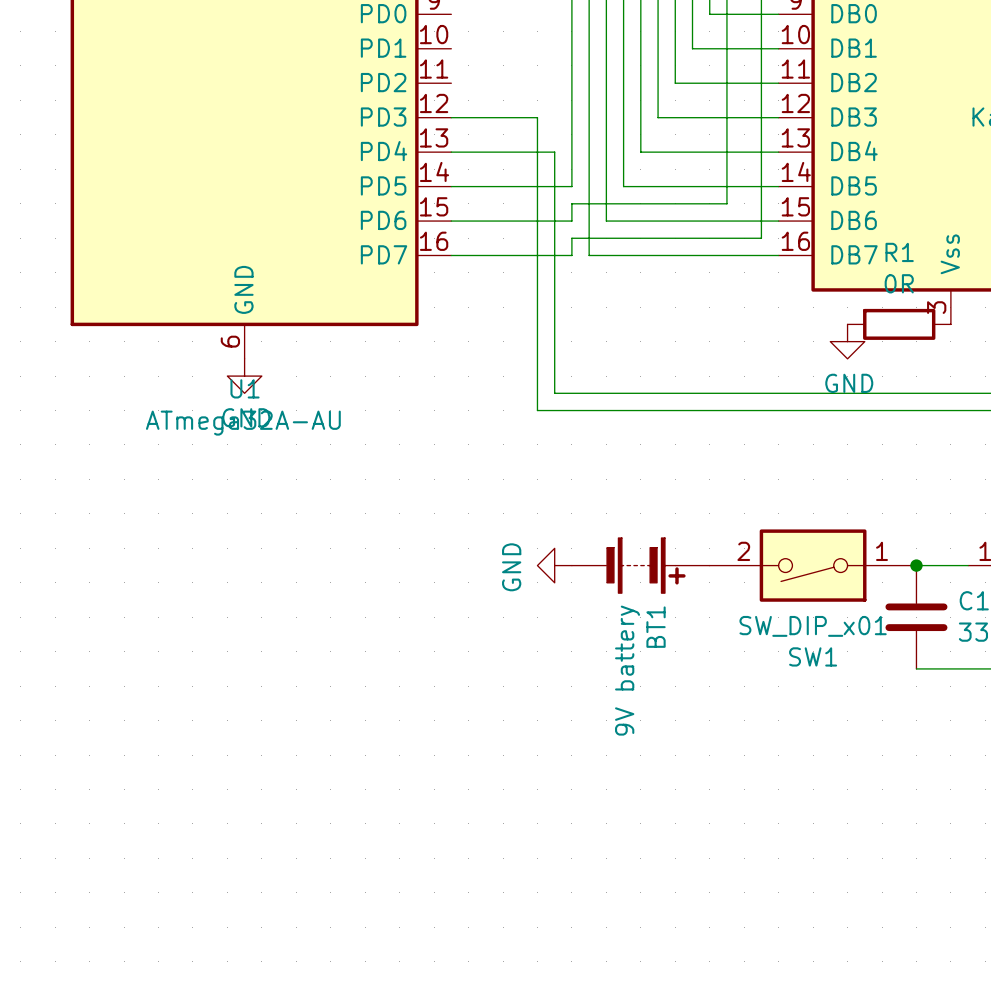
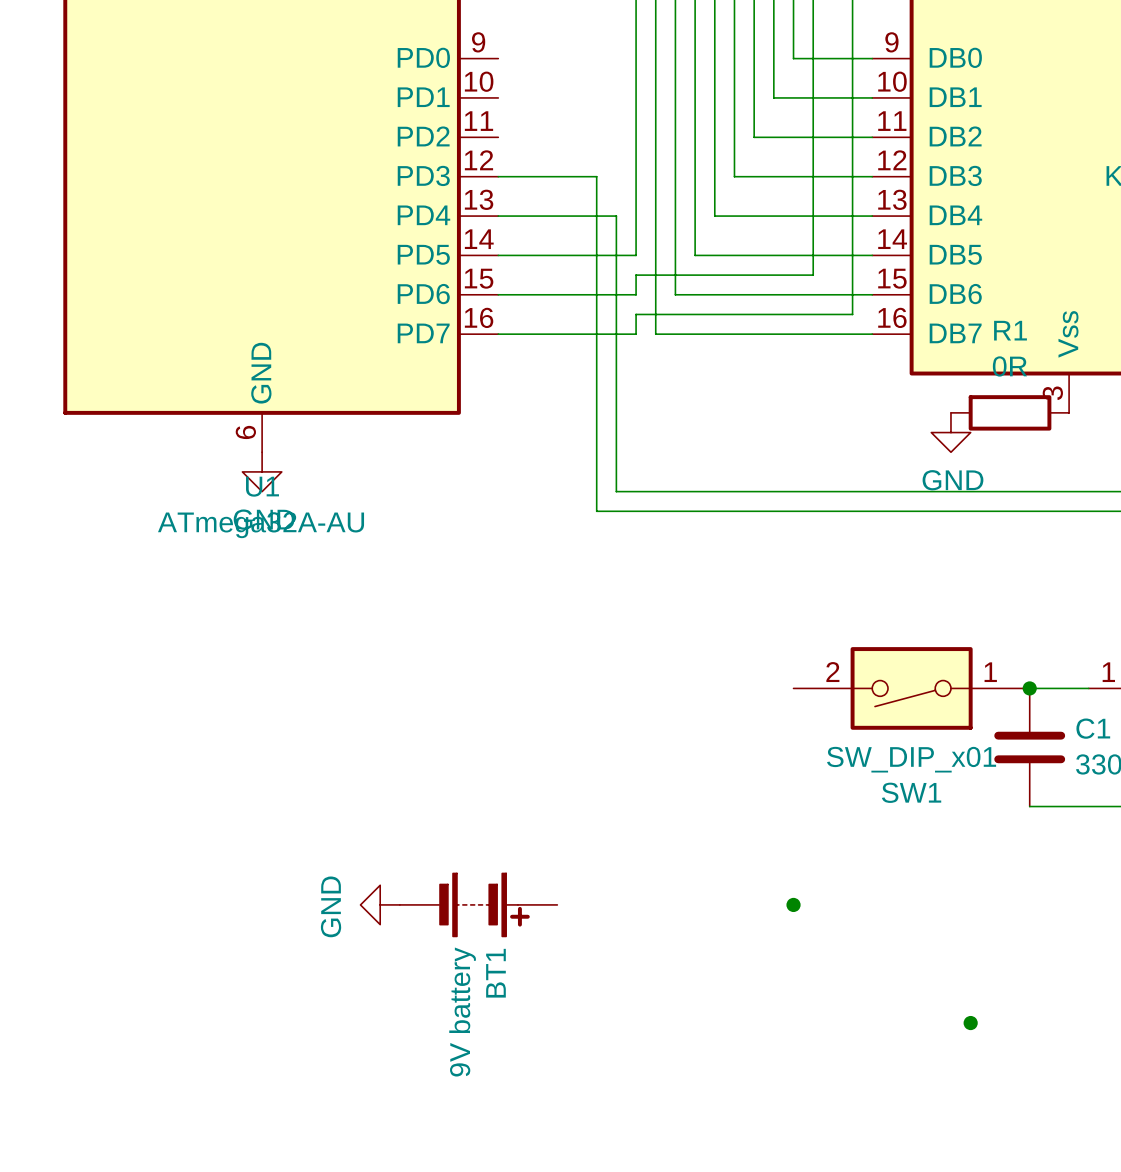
power symbol position: GND (554, 565) -> GND (380, 904)
BT1 position: (640, 565) -> (478, 904)
junction: none -> (793, 904)
junction: none -> (970, 1023)

